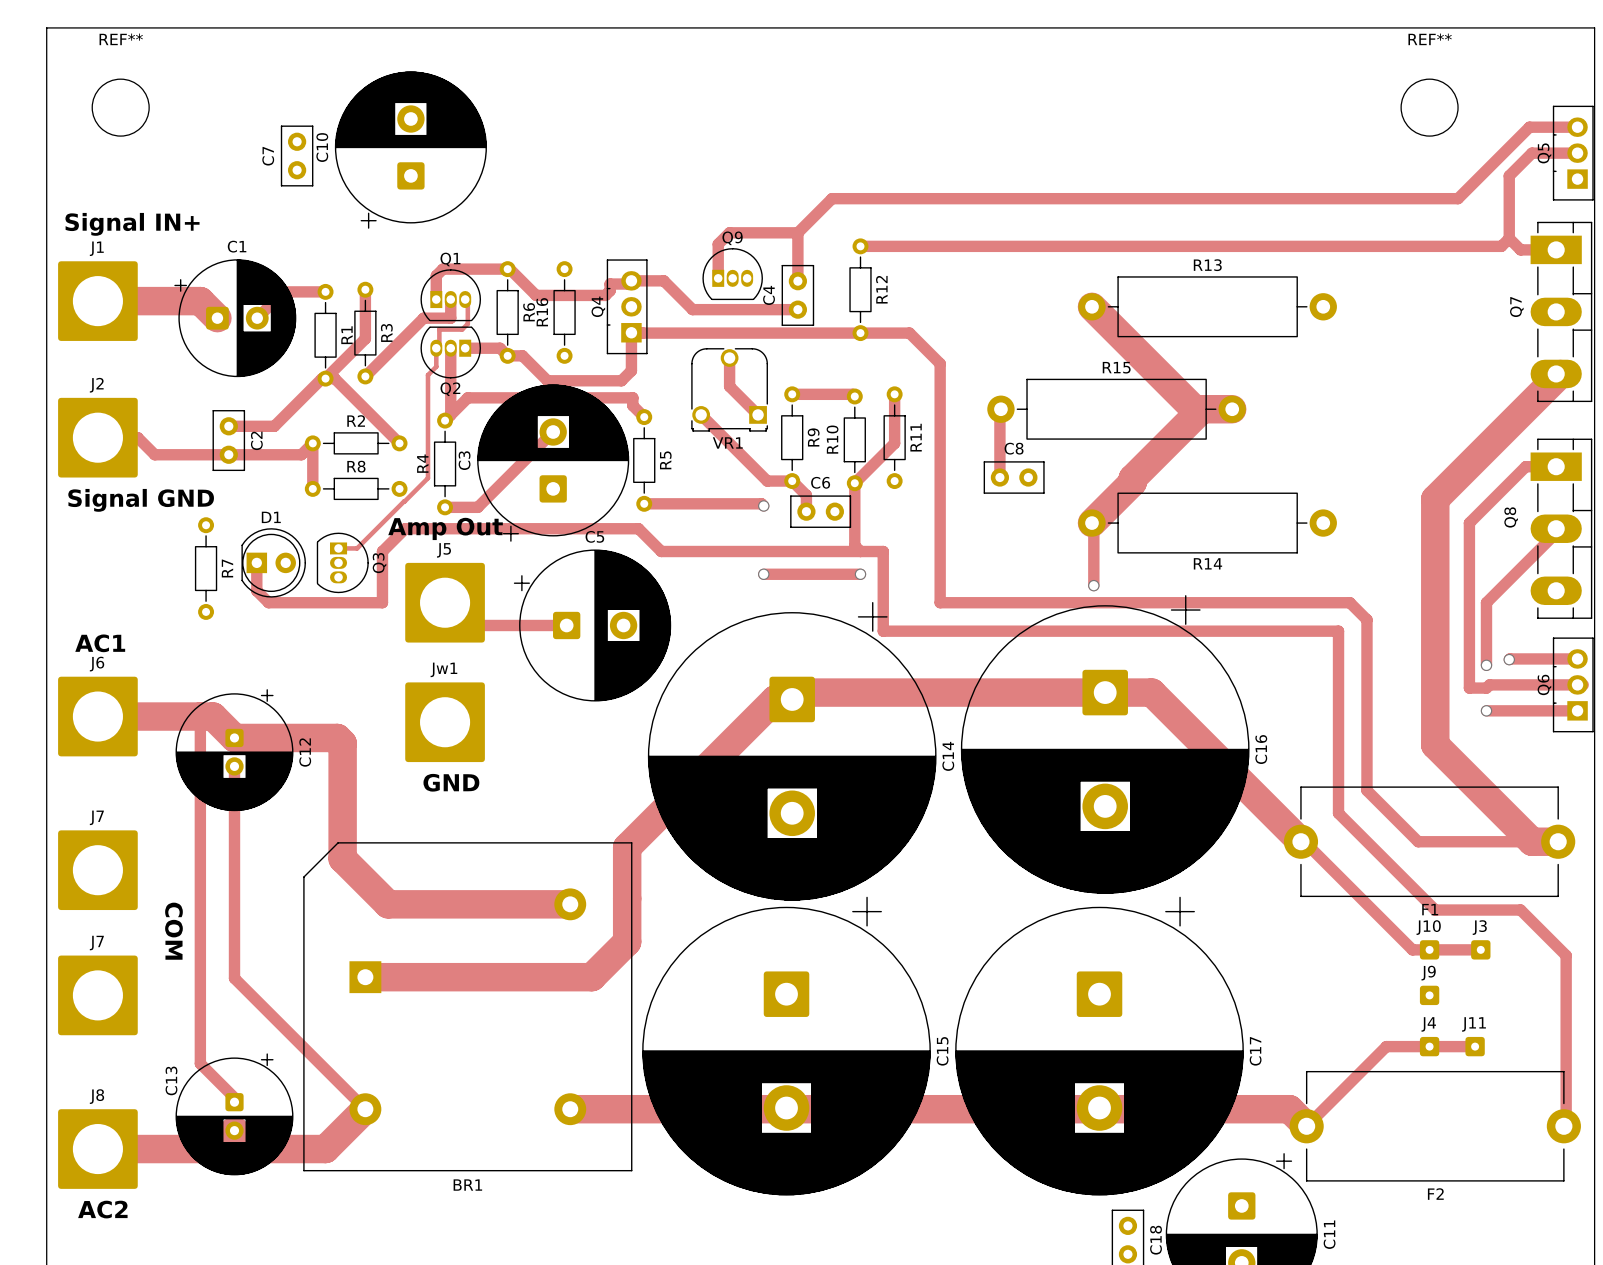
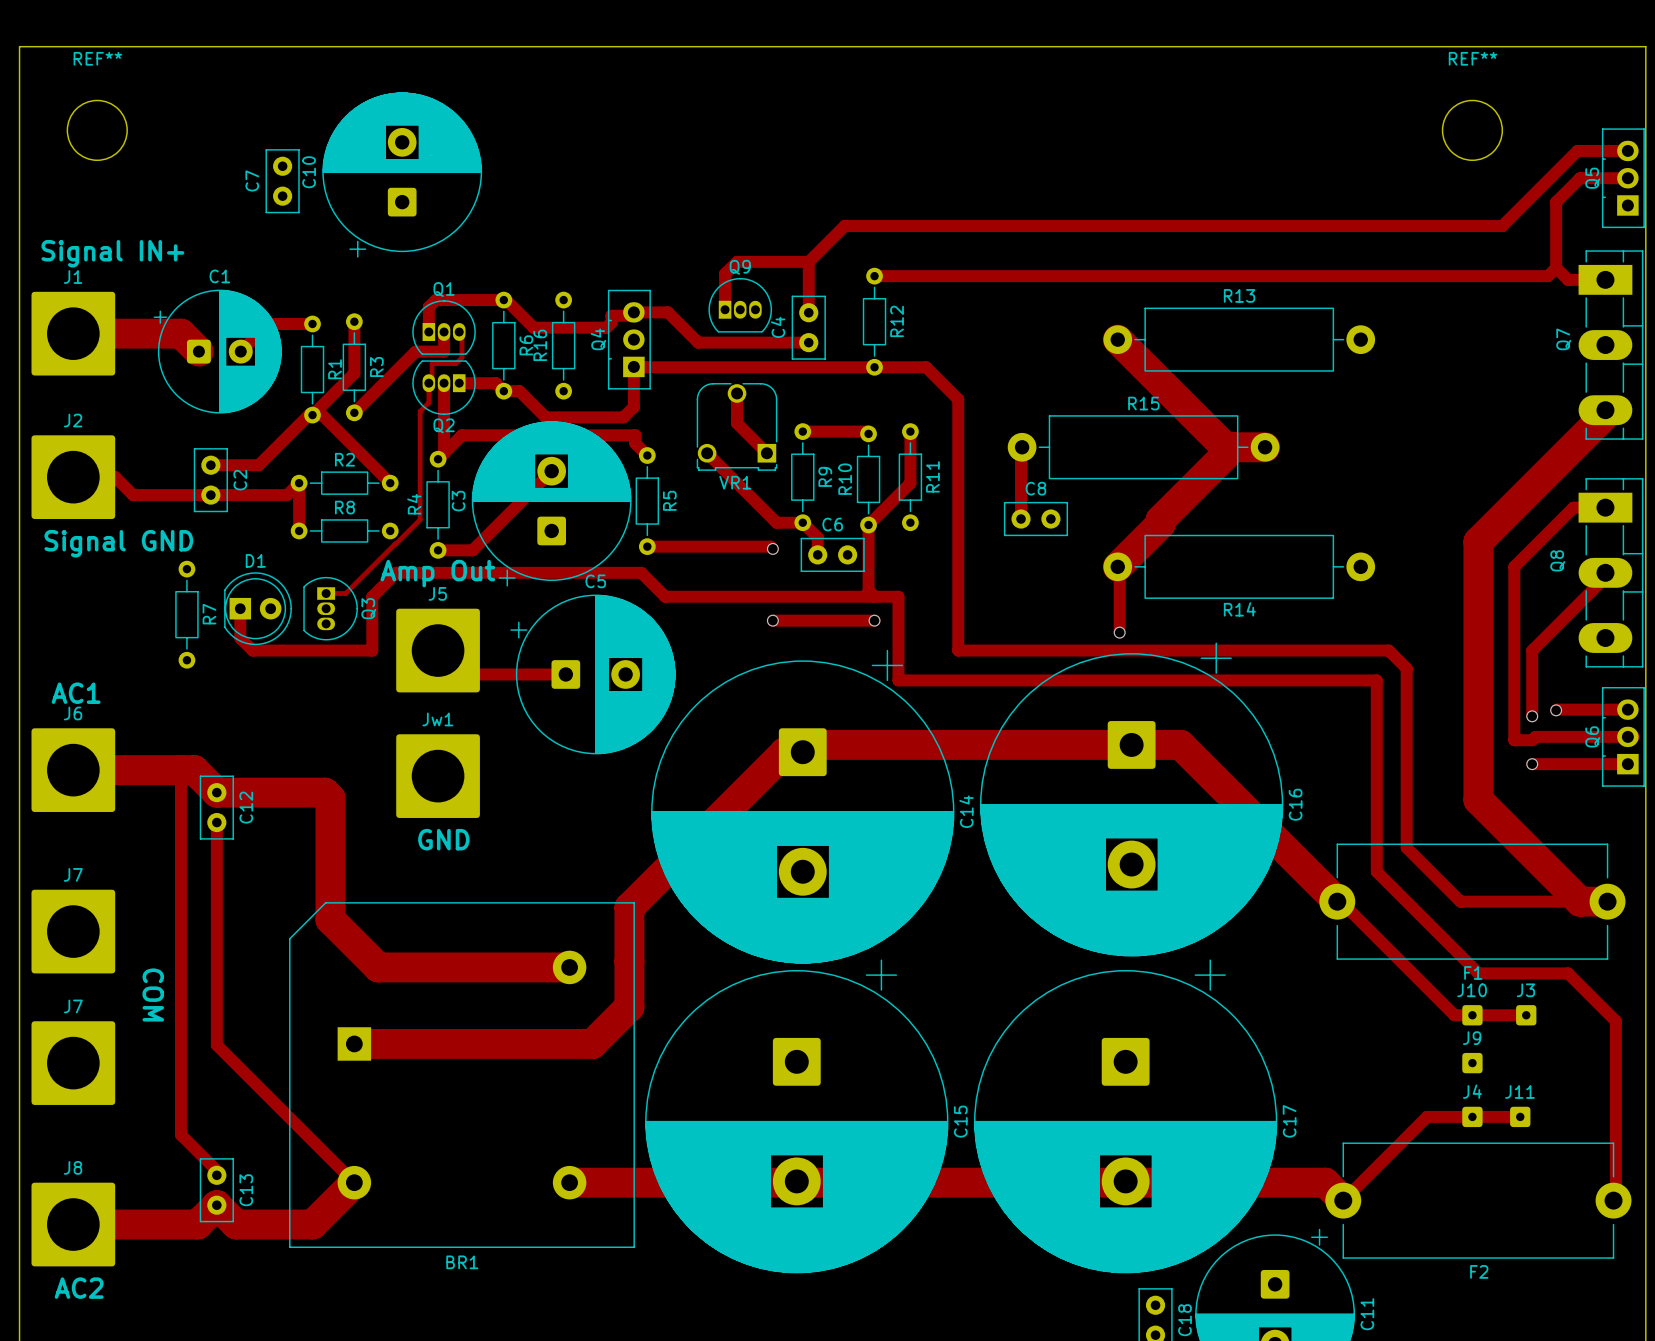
C12 footprint: [175, 689, 294, 812] -> [199, 775, 234, 840]
C12 name position: C12 (305, 752) -> C12 (246, 807)
C13 footprint: [175, 1053, 294, 1176] -> [199, 1158, 234, 1223]
C13 name position: C13 (171, 1080) -> C13 (246, 1190)

